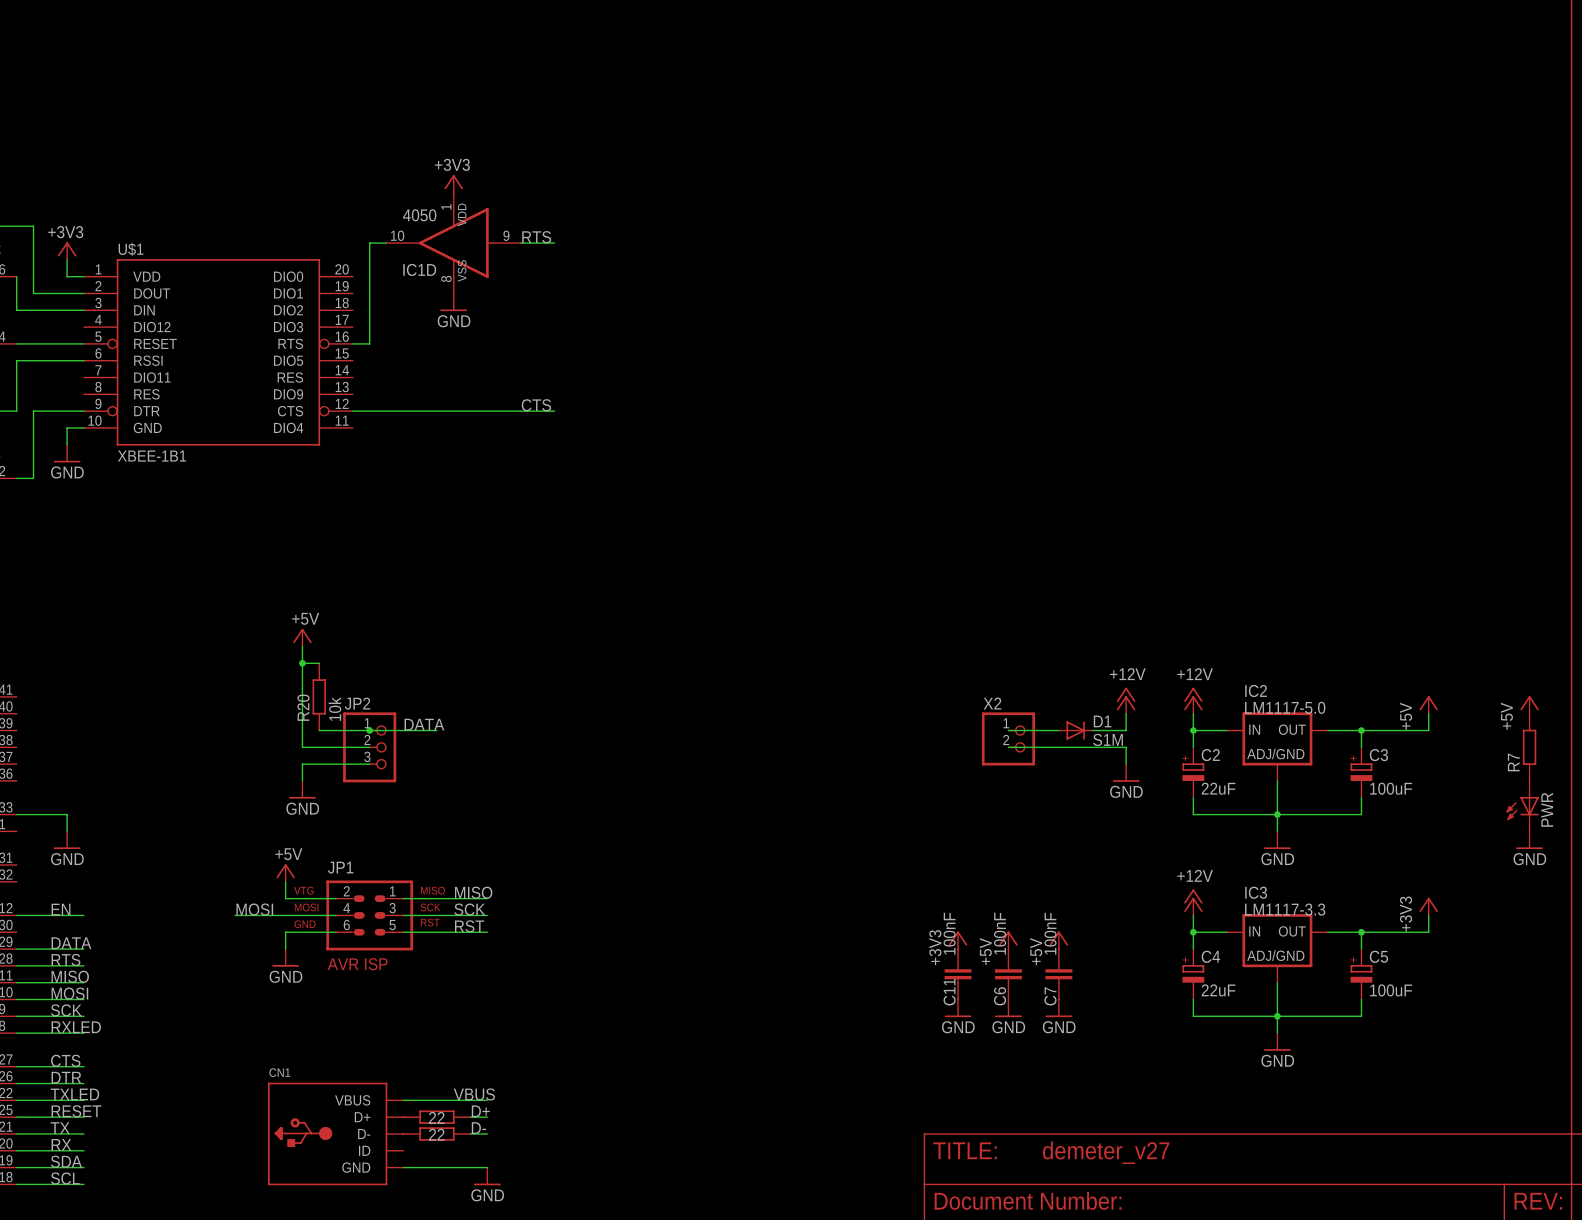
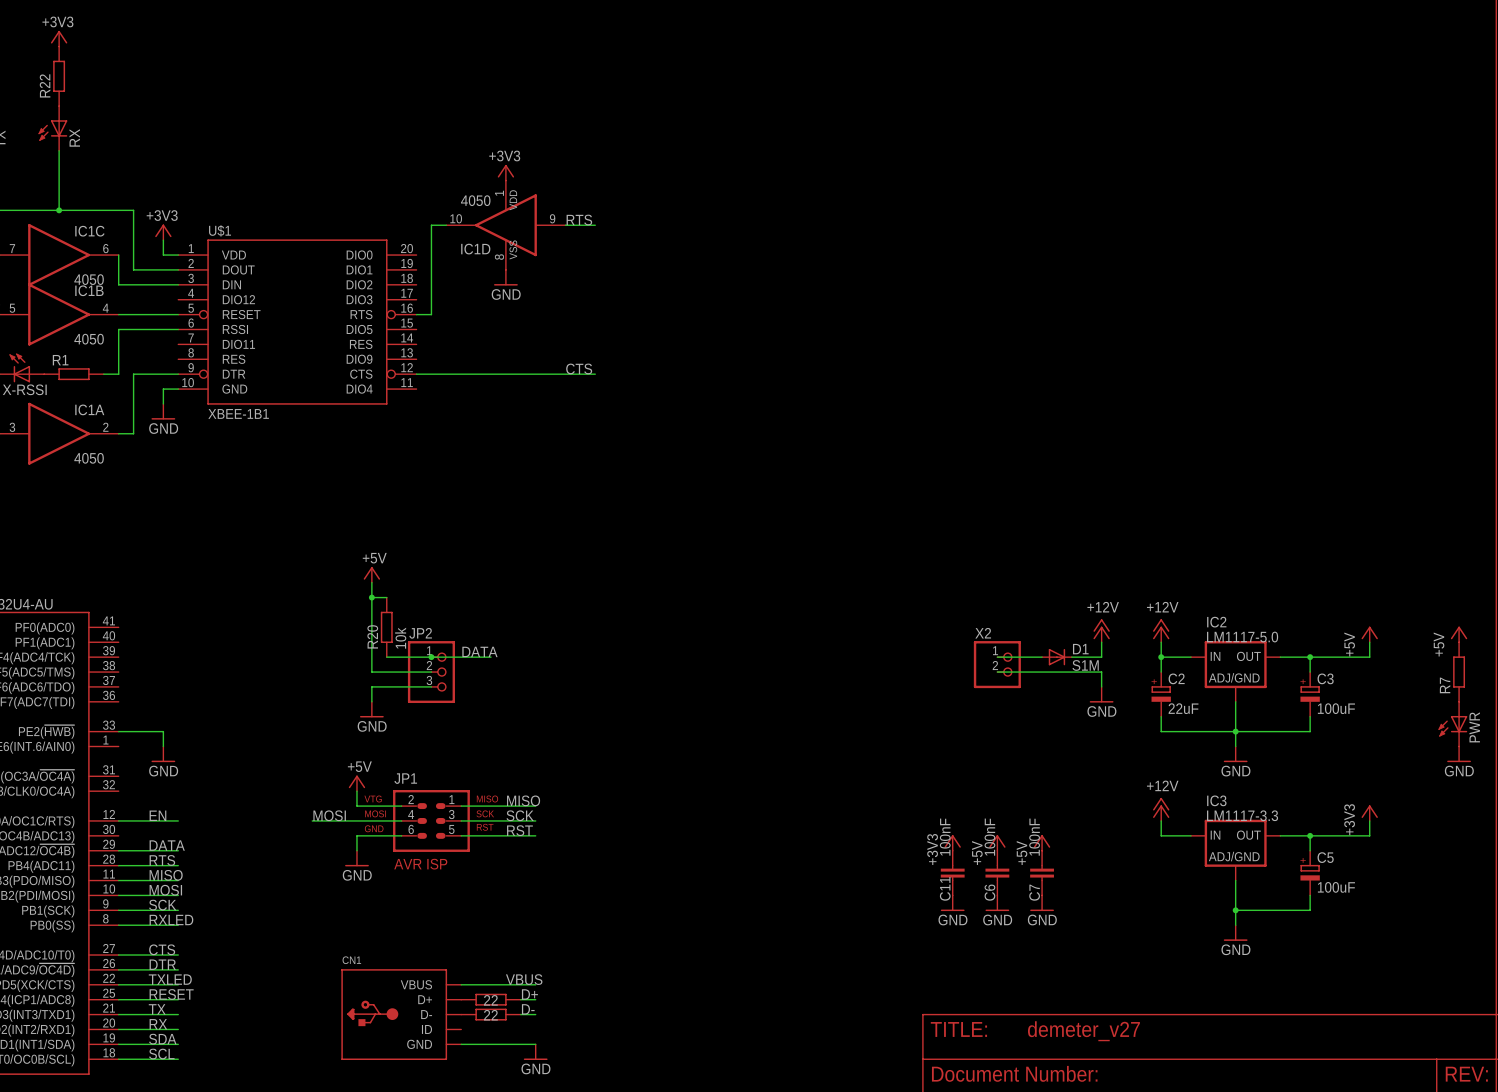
wire: (1193, 932) (1193, 949) -> none
junction: (1193, 932) -> none
C4: 22uF (1193, 974) -> none
wire: (1193, 999) (1193, 1016) (1277, 1016) -> none

